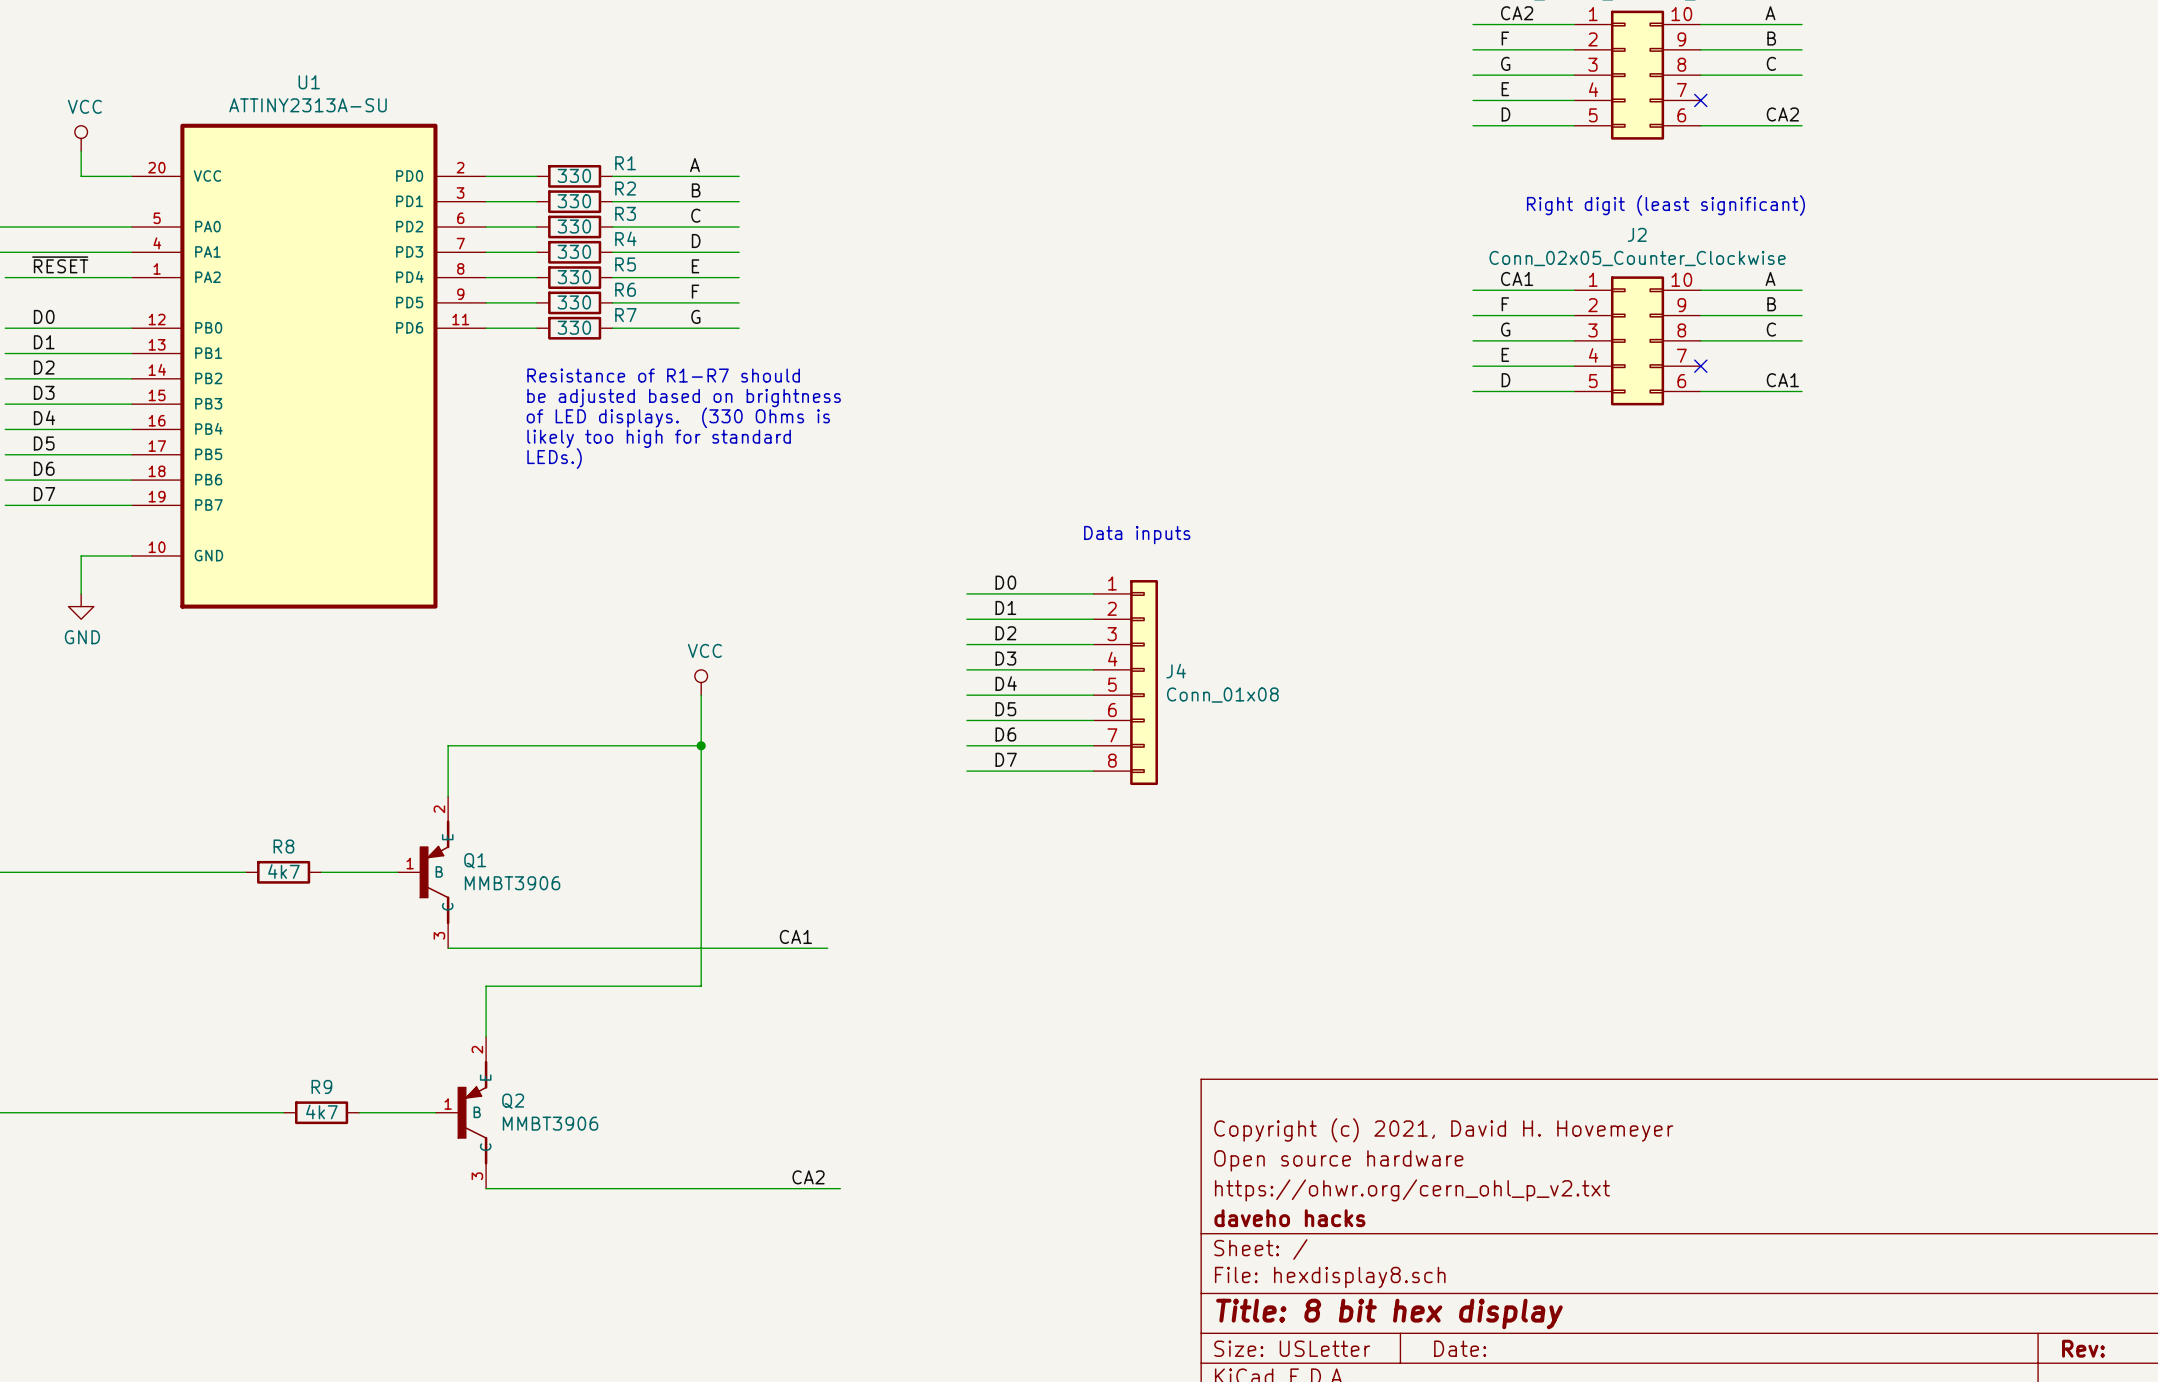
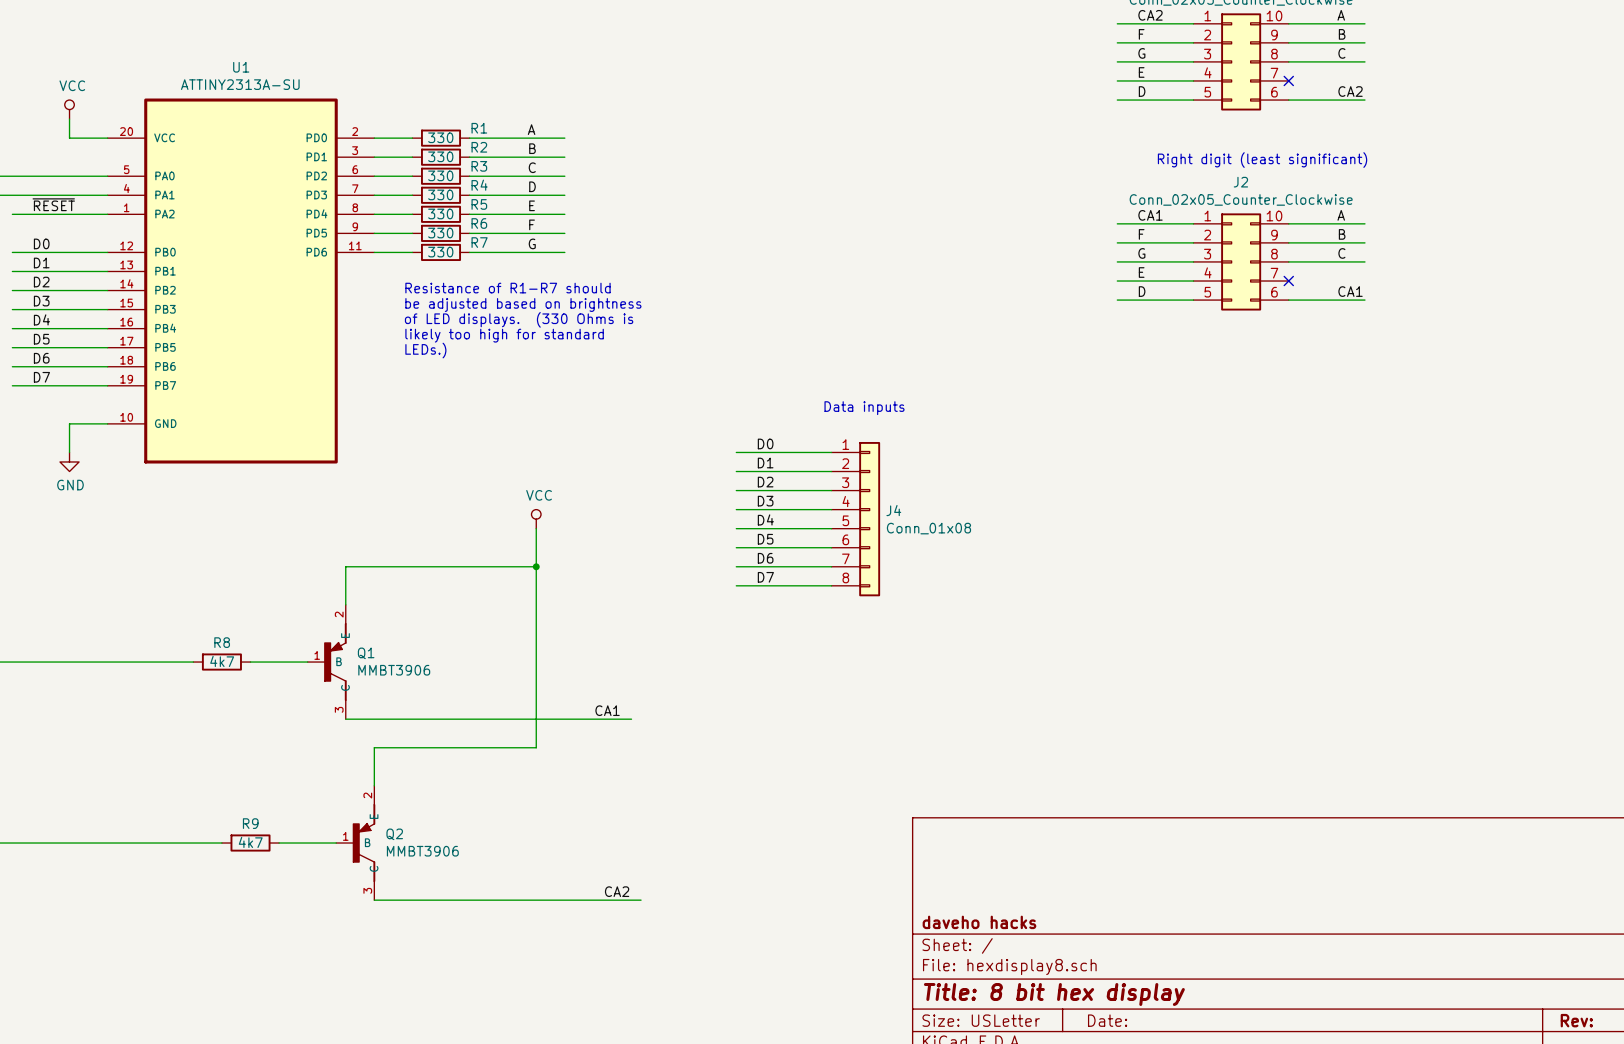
title block: Copyright (c) 2021, David H. Hovemeyer (1443, 1130) -> none
title block: Open source hardware (1338, 1160) -> none
title block: https://ohwr.org/cern_ohl_p_v2.txt (1412, 1190) -> none

